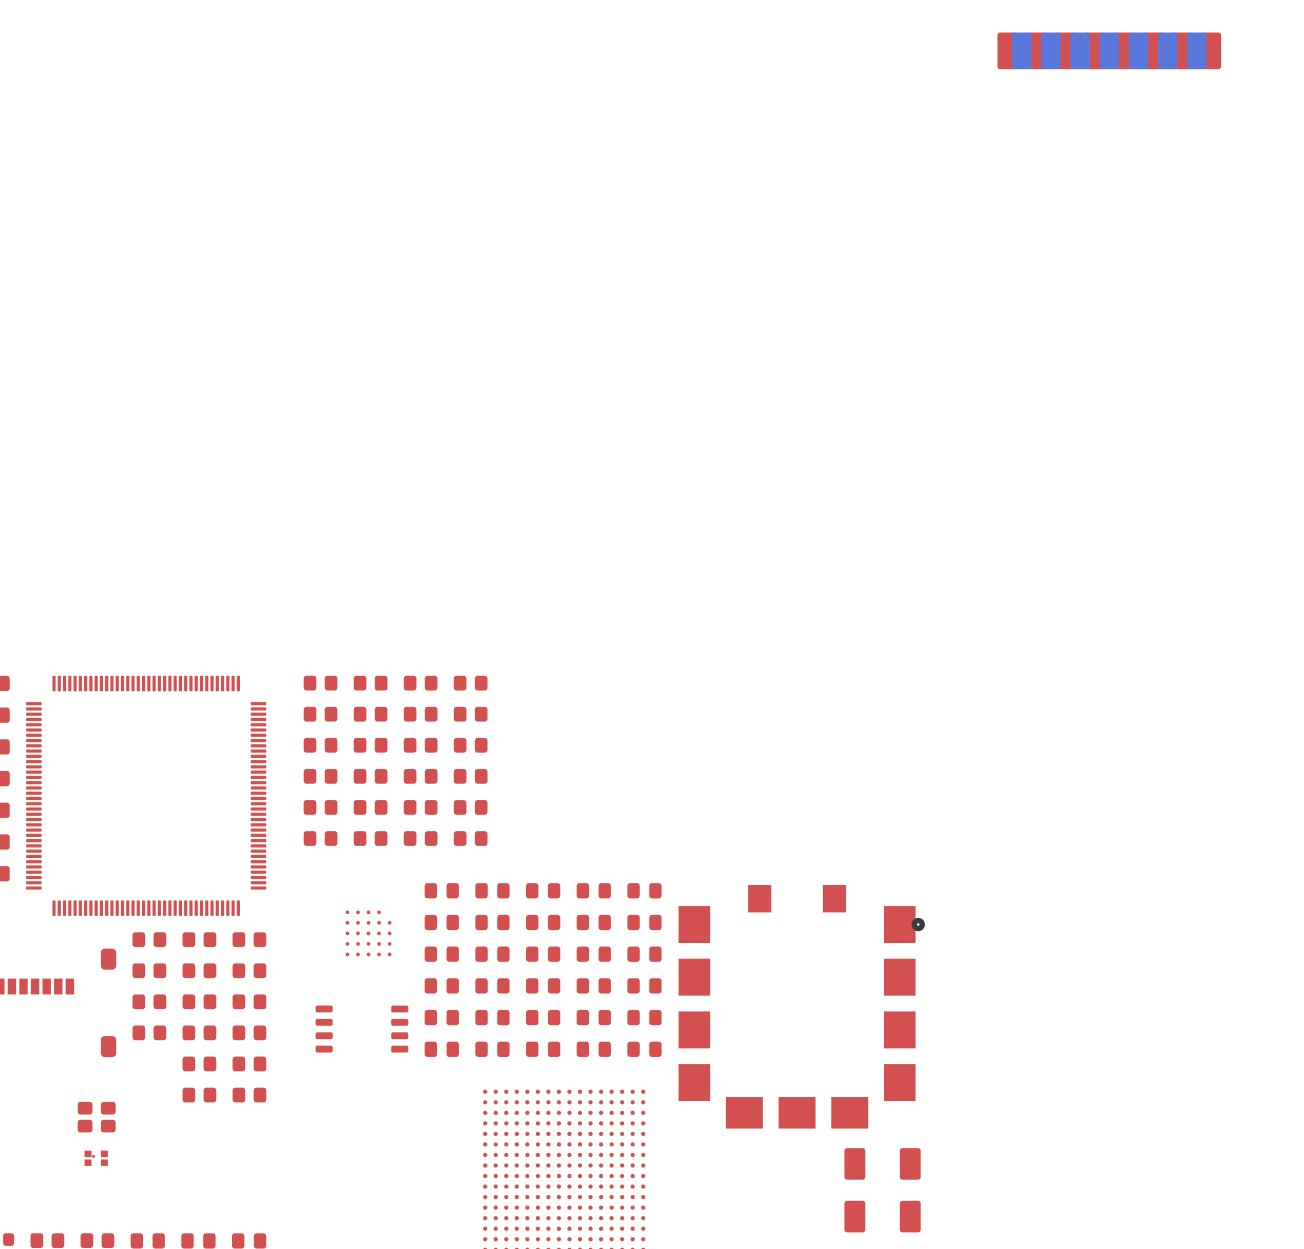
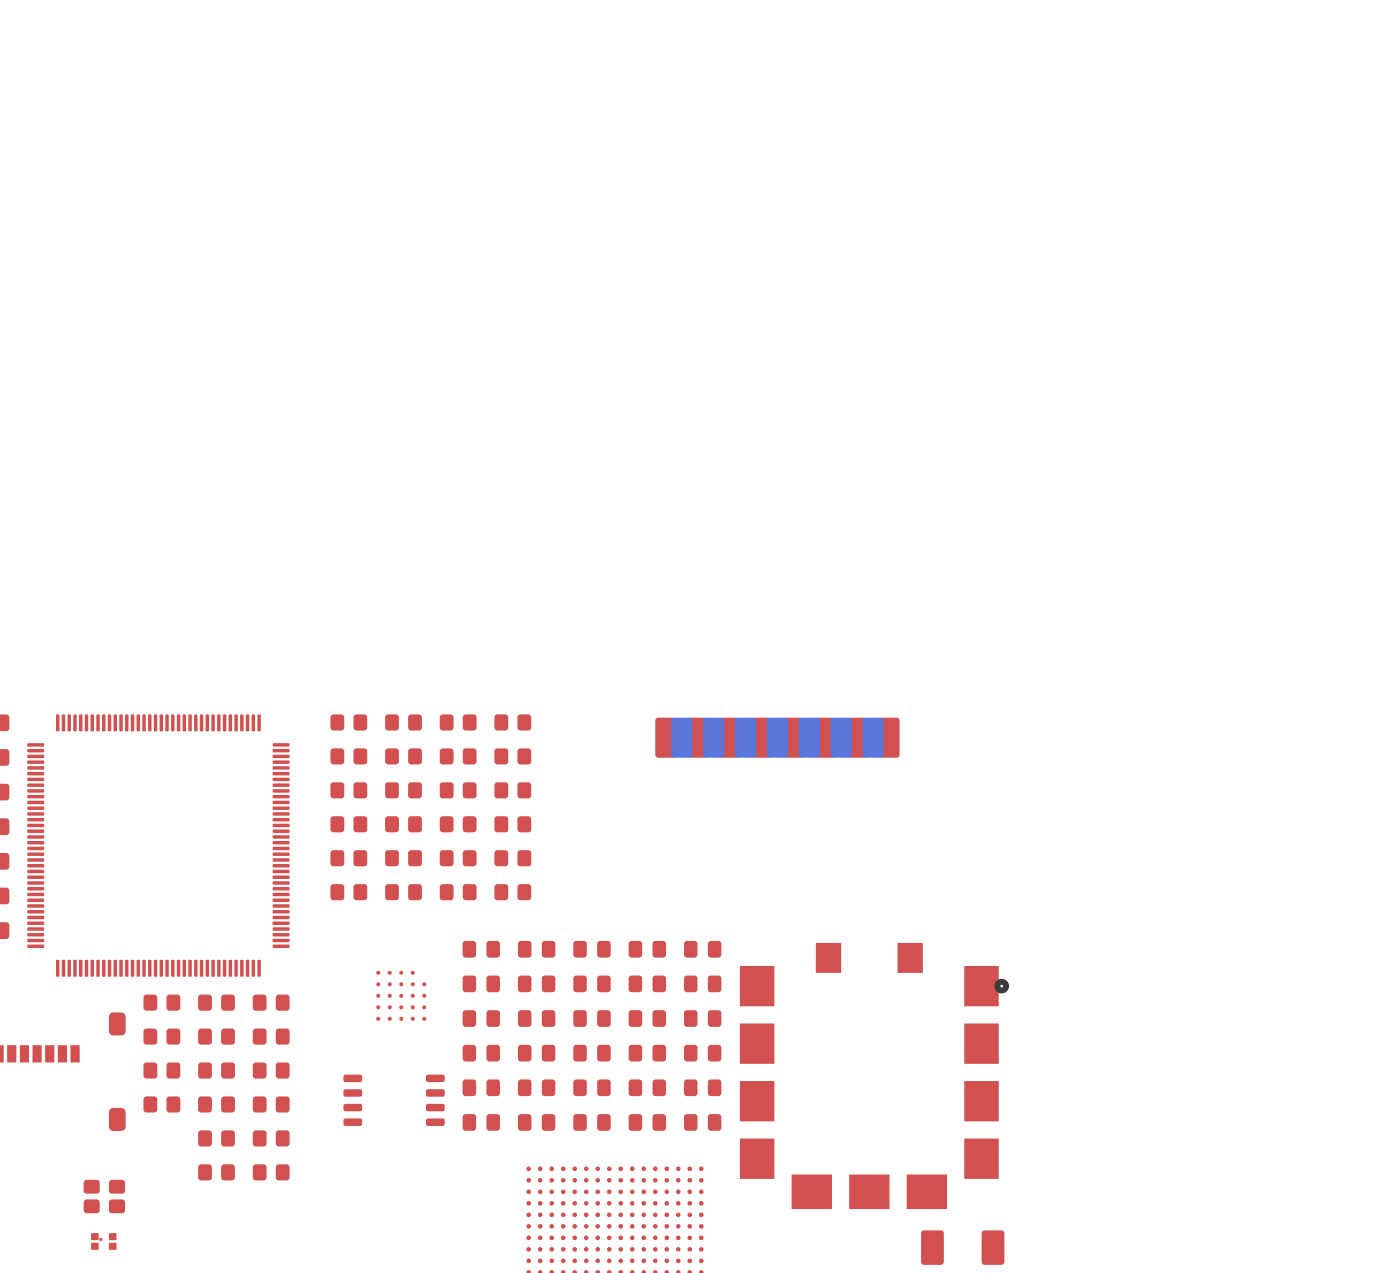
part: (1109, 50) -> none
part: none -> (777, 737)

